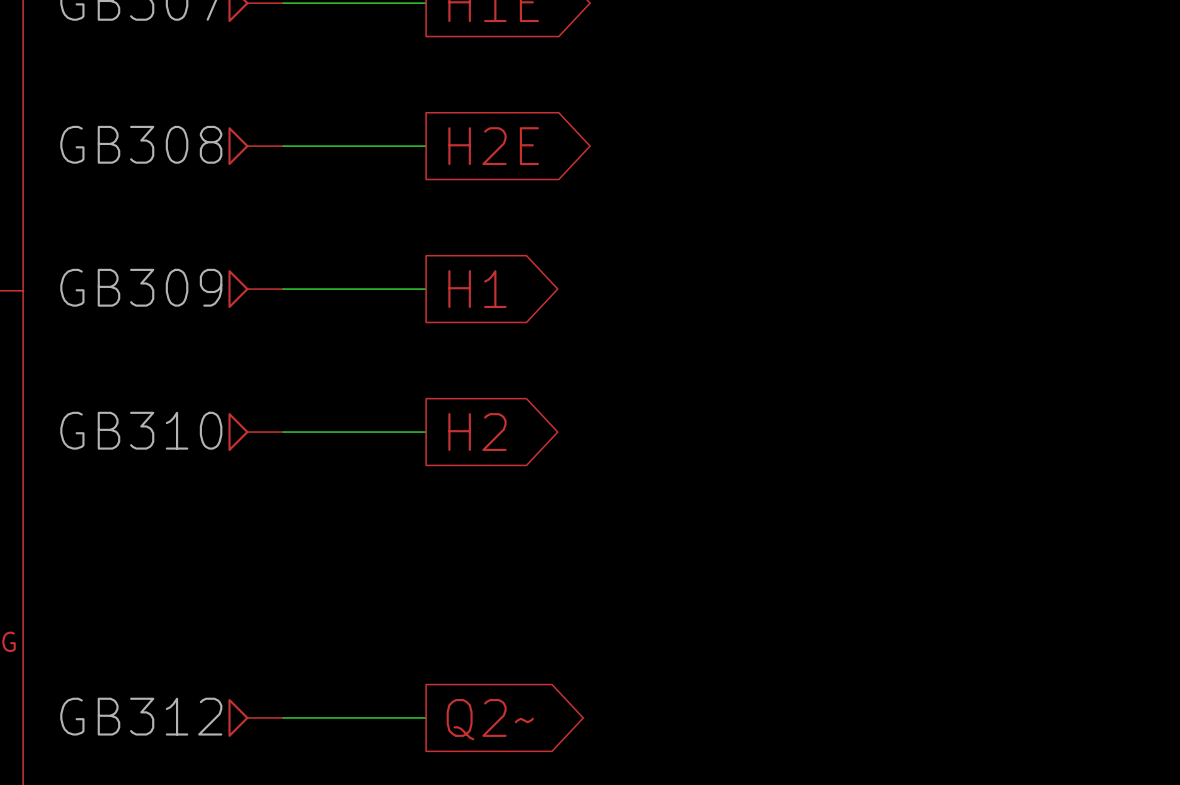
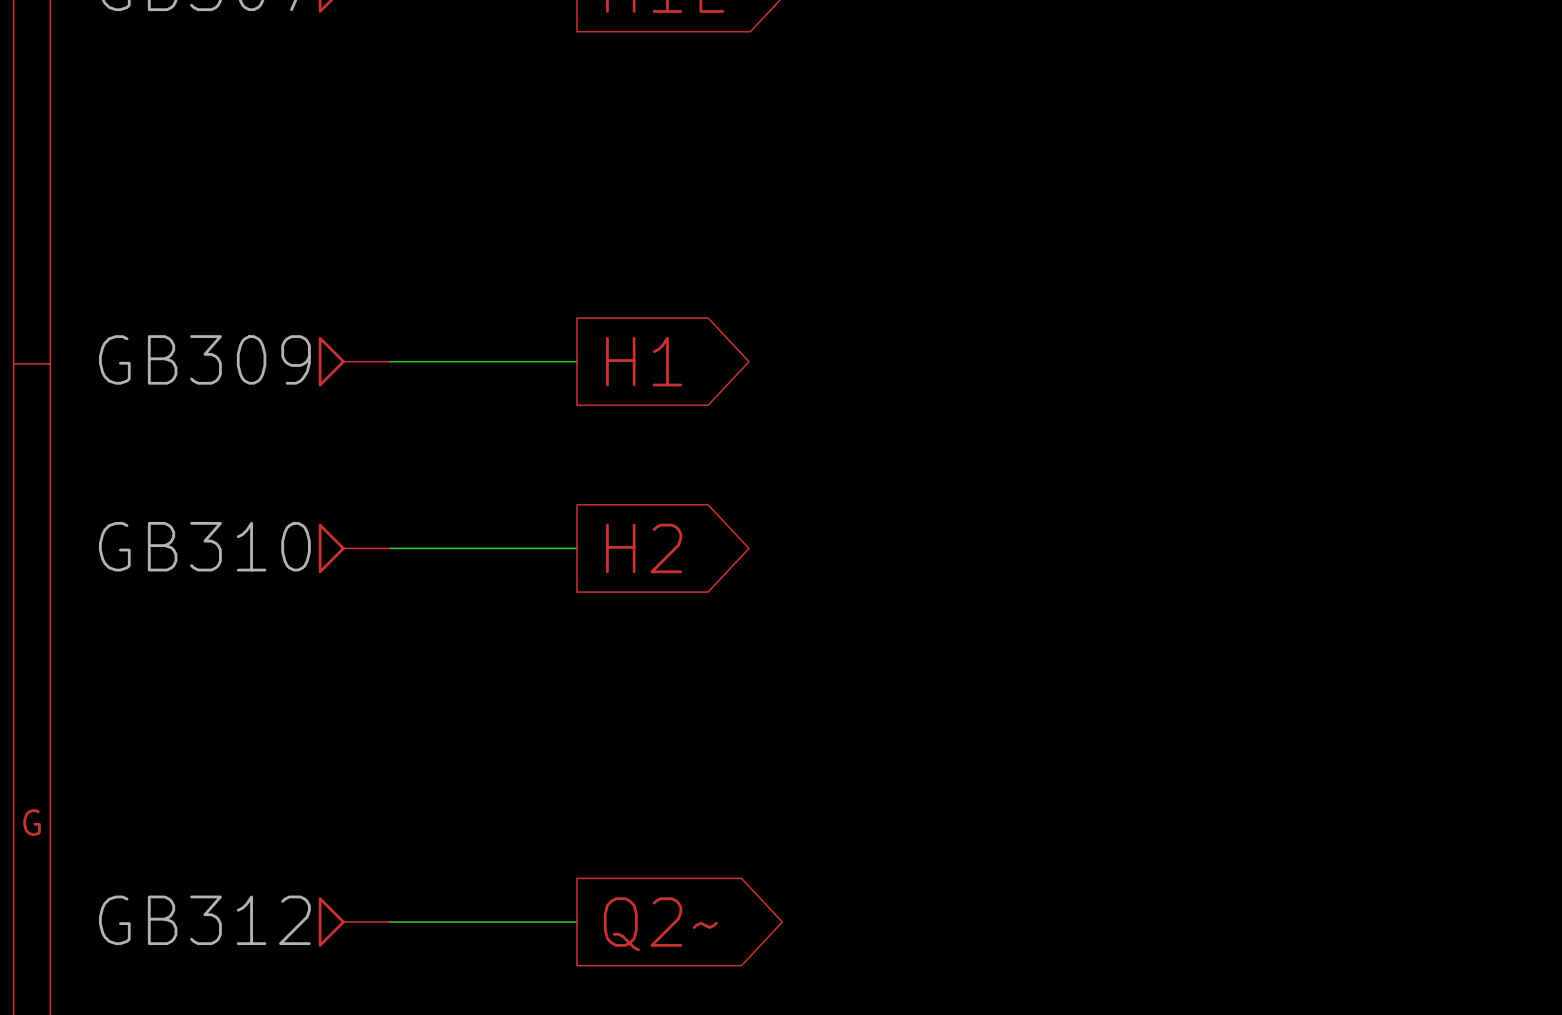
GB308: (255, 146) -> none
wire: (283, 146) (426, 146) -> none
global label: H2E (493, 146) -> none

